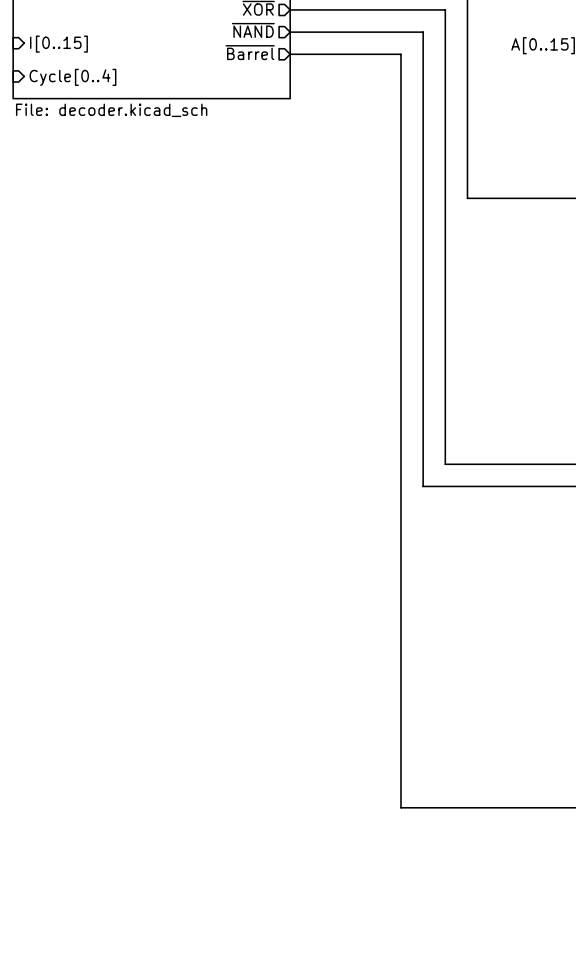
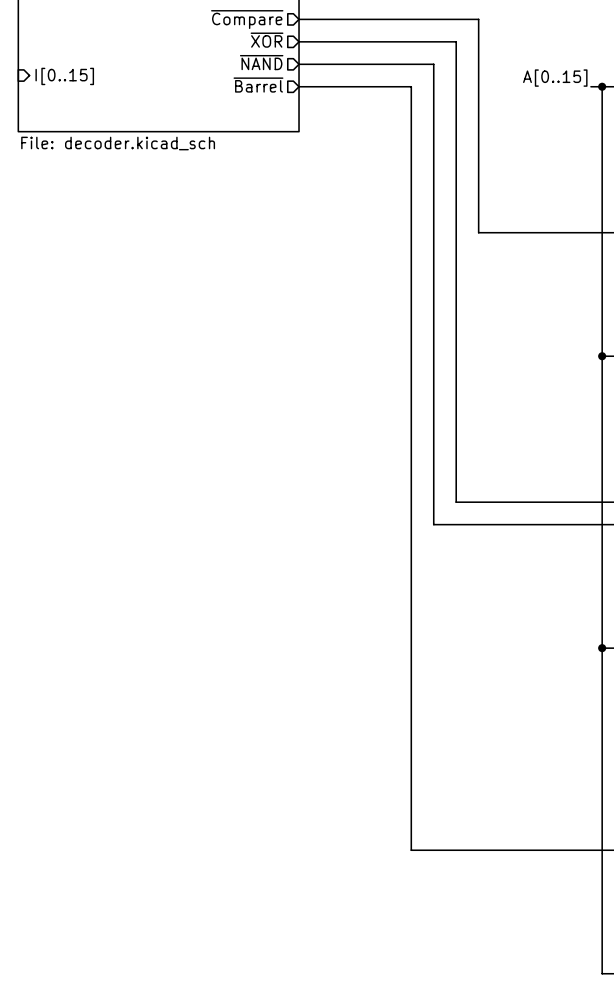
sheet pin: Cycle[0..4] (72, 77) -> none

